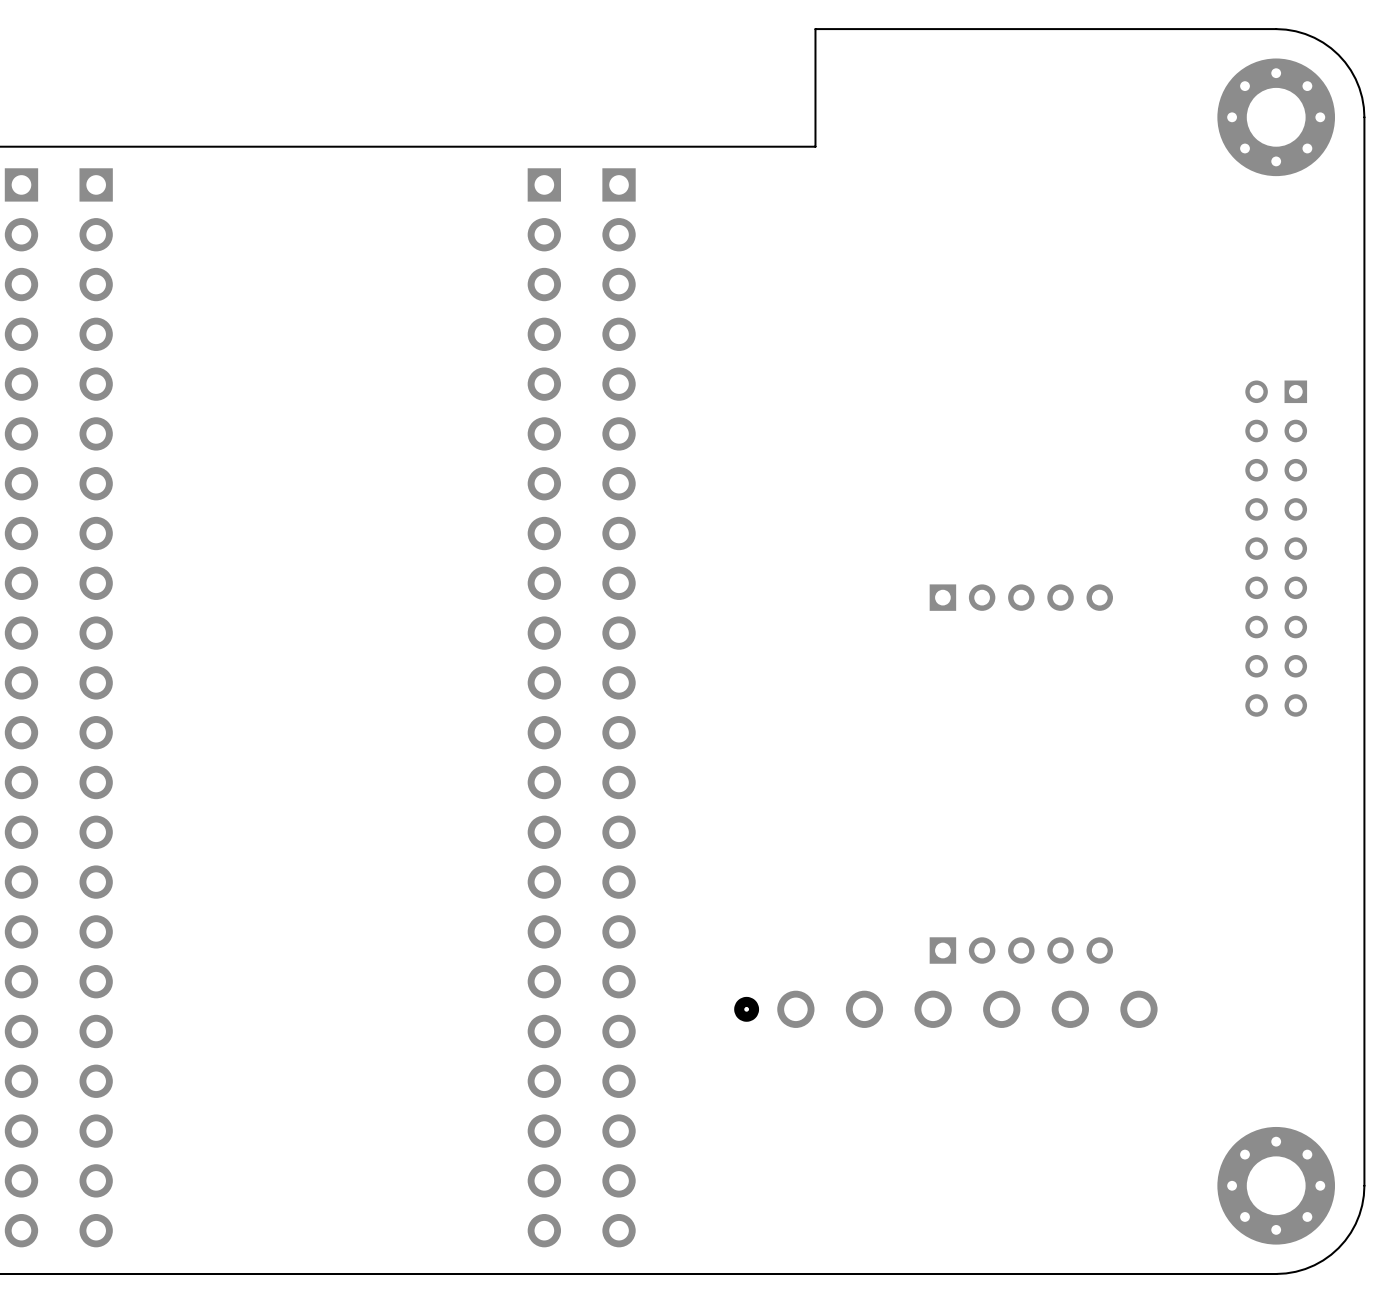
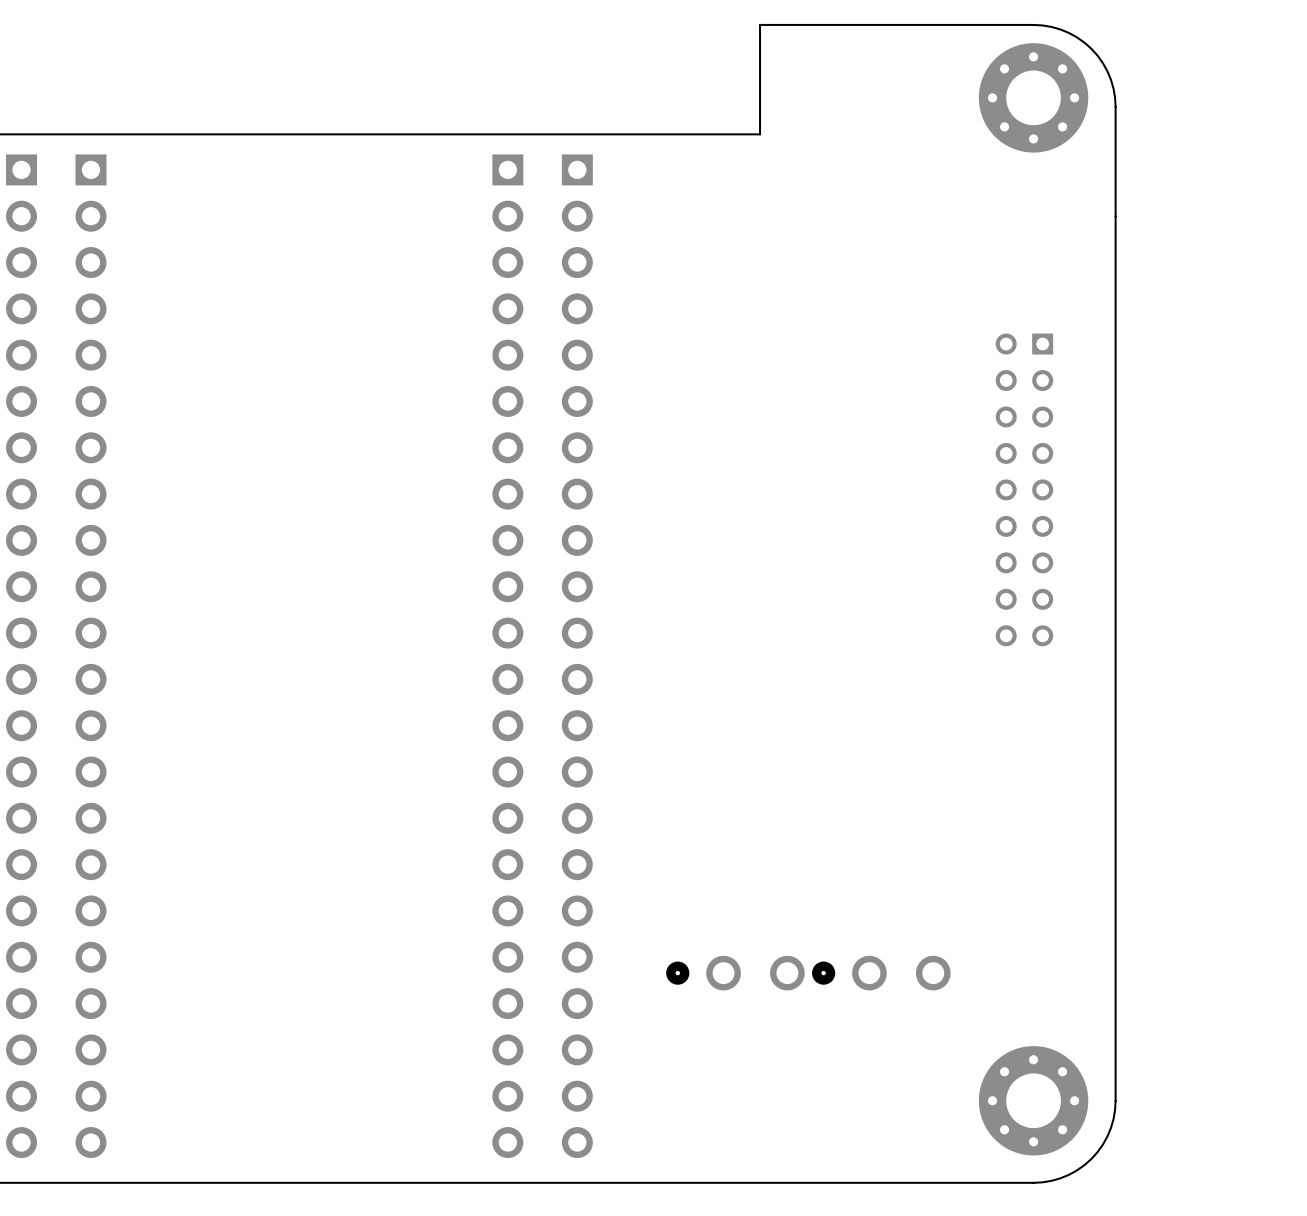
board edge: (1109, 29) (1276, 29) (1305, 34) (1331, 48) (1350, 70) (1359, 88) (1364, 117) (1364, 1185) (1362, 1205) (1355, 1224) (1338, 1248) (1314, 1265) (1295, 1271) (1276, 1274) (1109, 1274) -> (1033, 24) (1051, 26) (1069, 33) (1091, 48) (1107, 71) (1113, 88) (1115, 106) (1115, 1109) (1107, 1136) (1091, 1158) (1069, 1174) (1051, 1180) (1033, 1182)
part position: (1276, 117) -> (1033, 97)
part position: (1276, 548) -> (1024, 489)
part: (1021, 597) -> none
part: (1021, 950) -> none
part: (945, 1009) -> none
part: none -> (735, 973)
part: none -> (881, 973)
part position: (1276, 1185) -> (1033, 1100)

